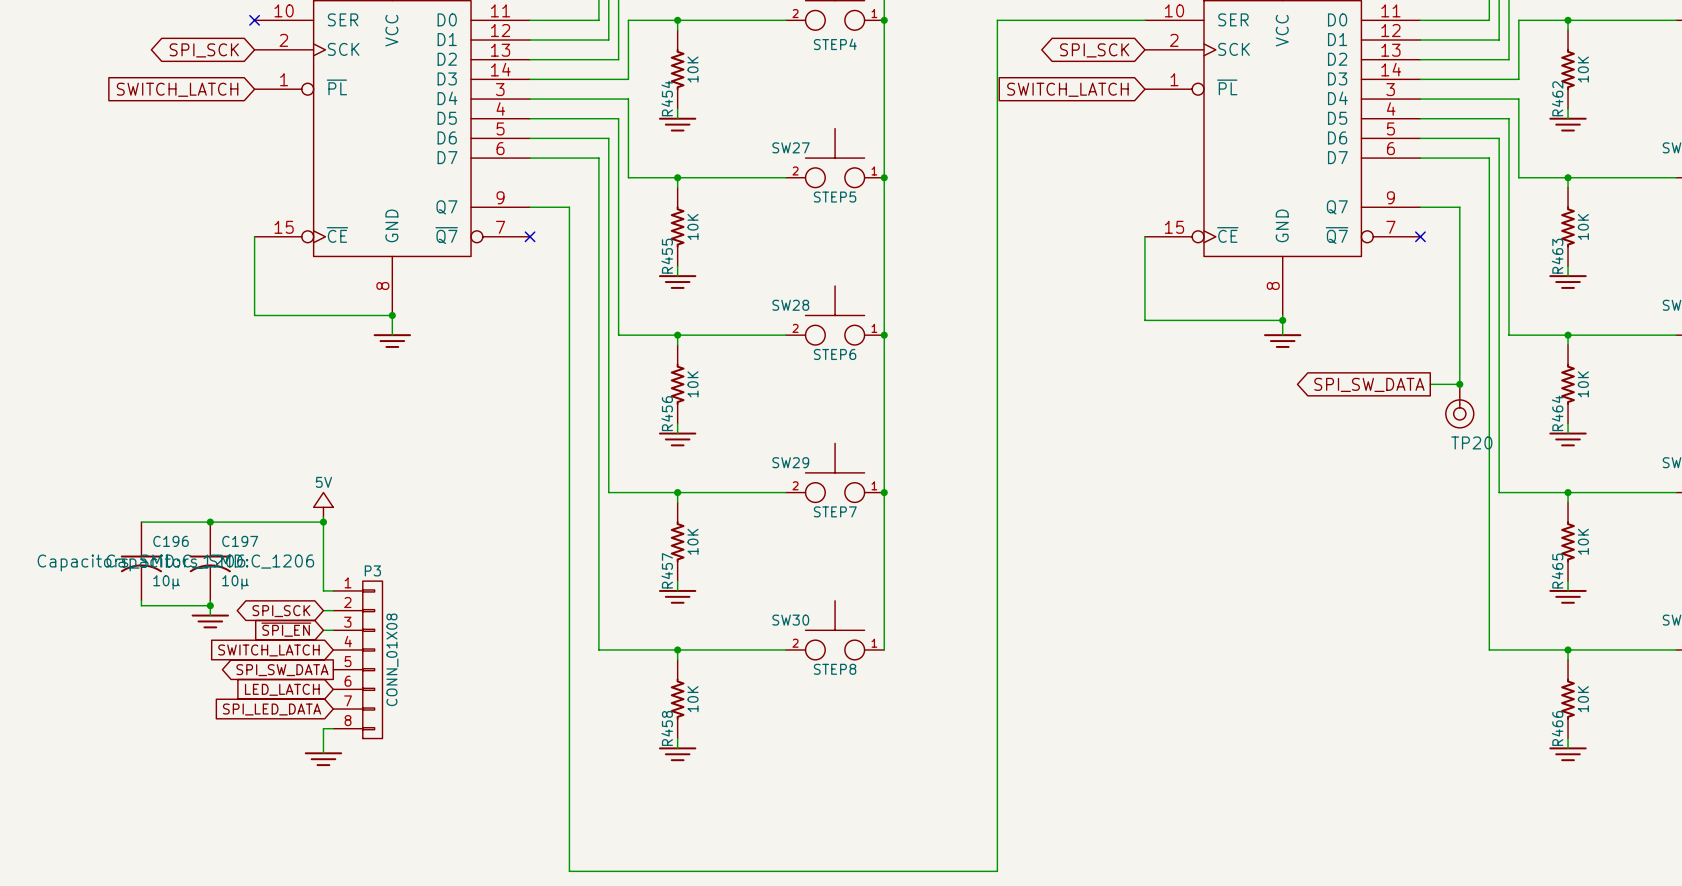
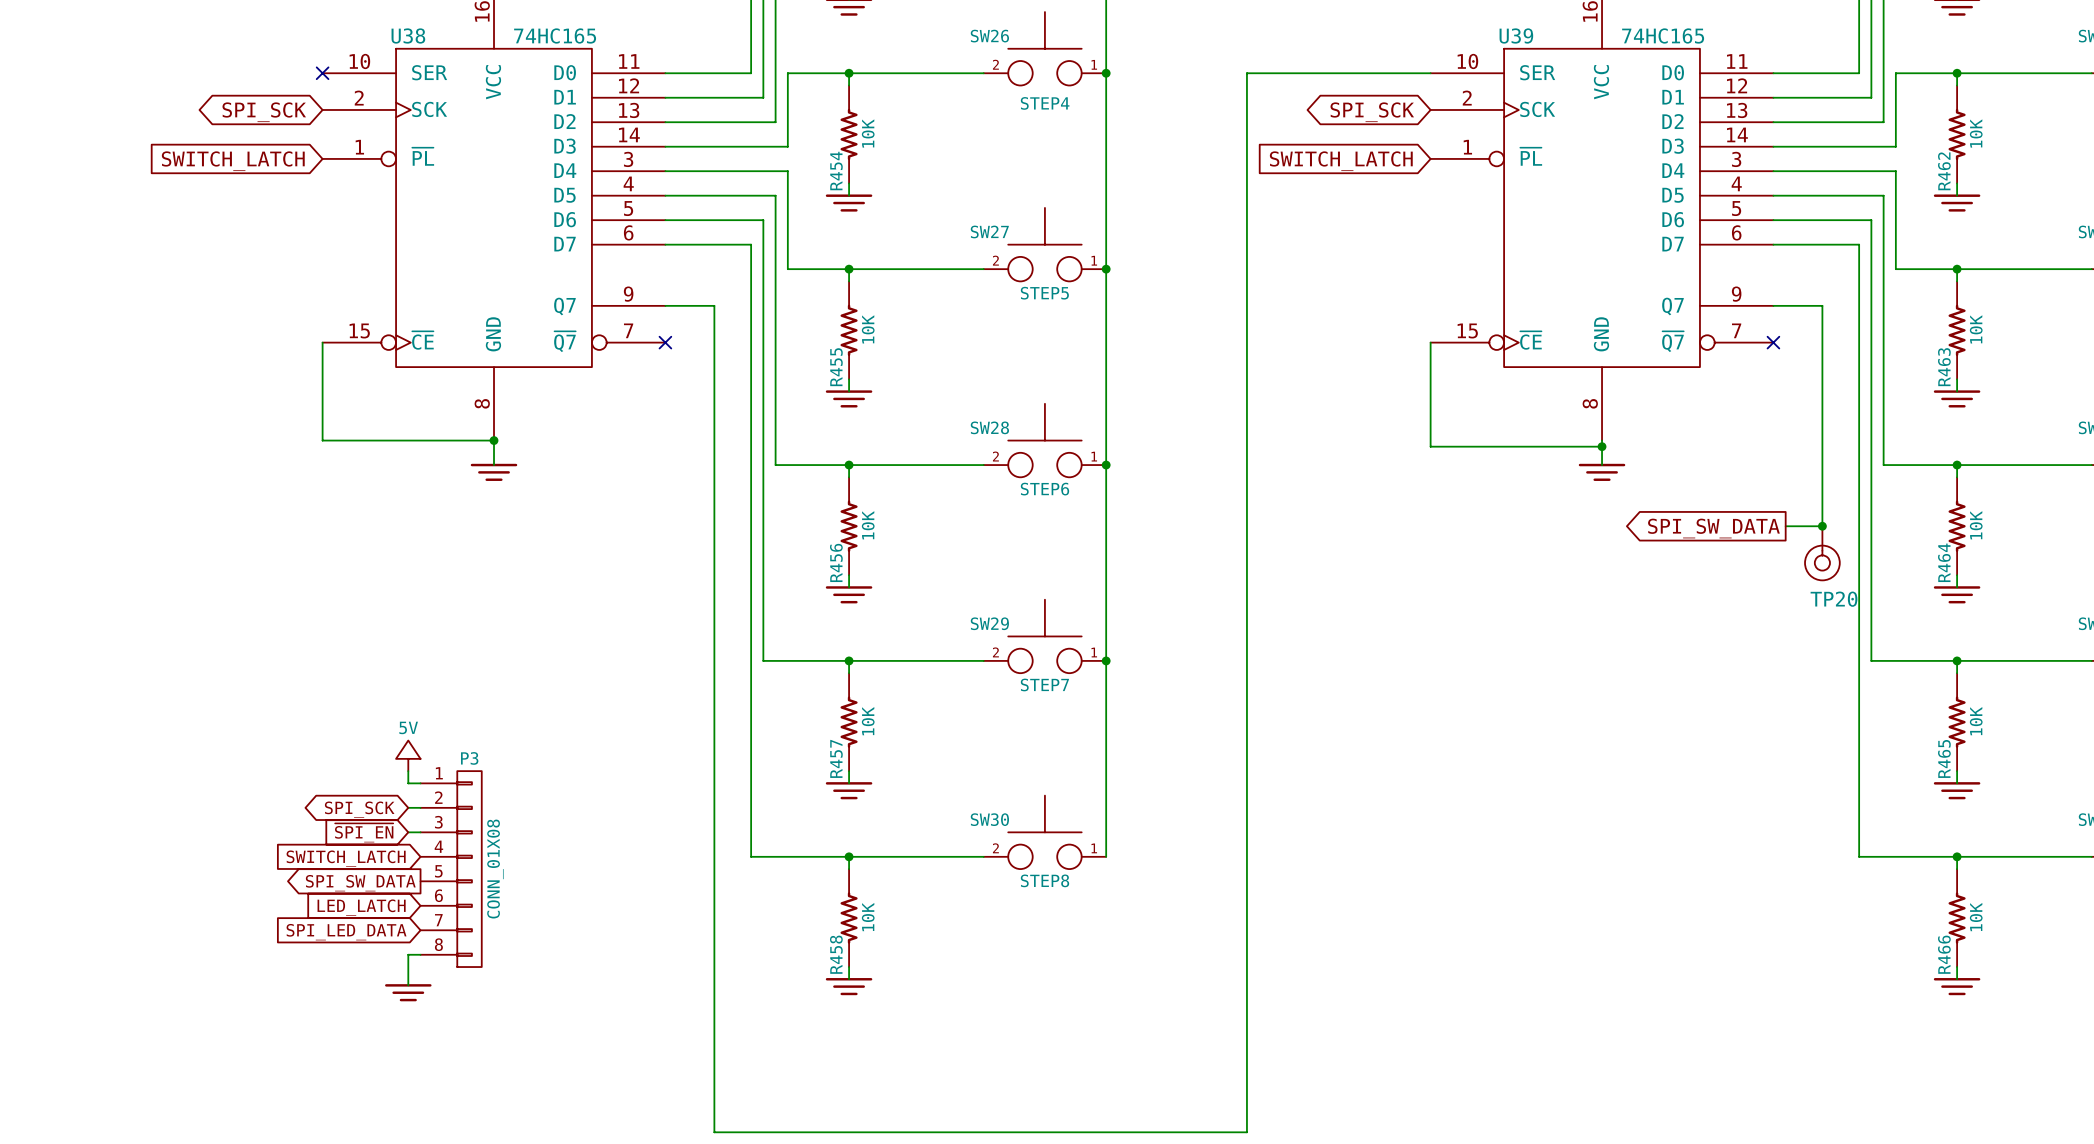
power symbol position: 5V (323, 504) -> 5V (408, 755)
wire: (323, 517) (323, 581) -> none
wire: (141, 522) (323, 522) -> none
junction: (210, 522) -> none
junction: (323, 522) -> none
C196: 10µ (141, 561) -> none
C197: 10µ (210, 561) -> none
wire: (141, 600) (141, 605) (210, 605) -> none
wire: (210, 600) (210, 615) -> none
junction: (210, 605) -> none
power symbol: (210, 621) -> none

